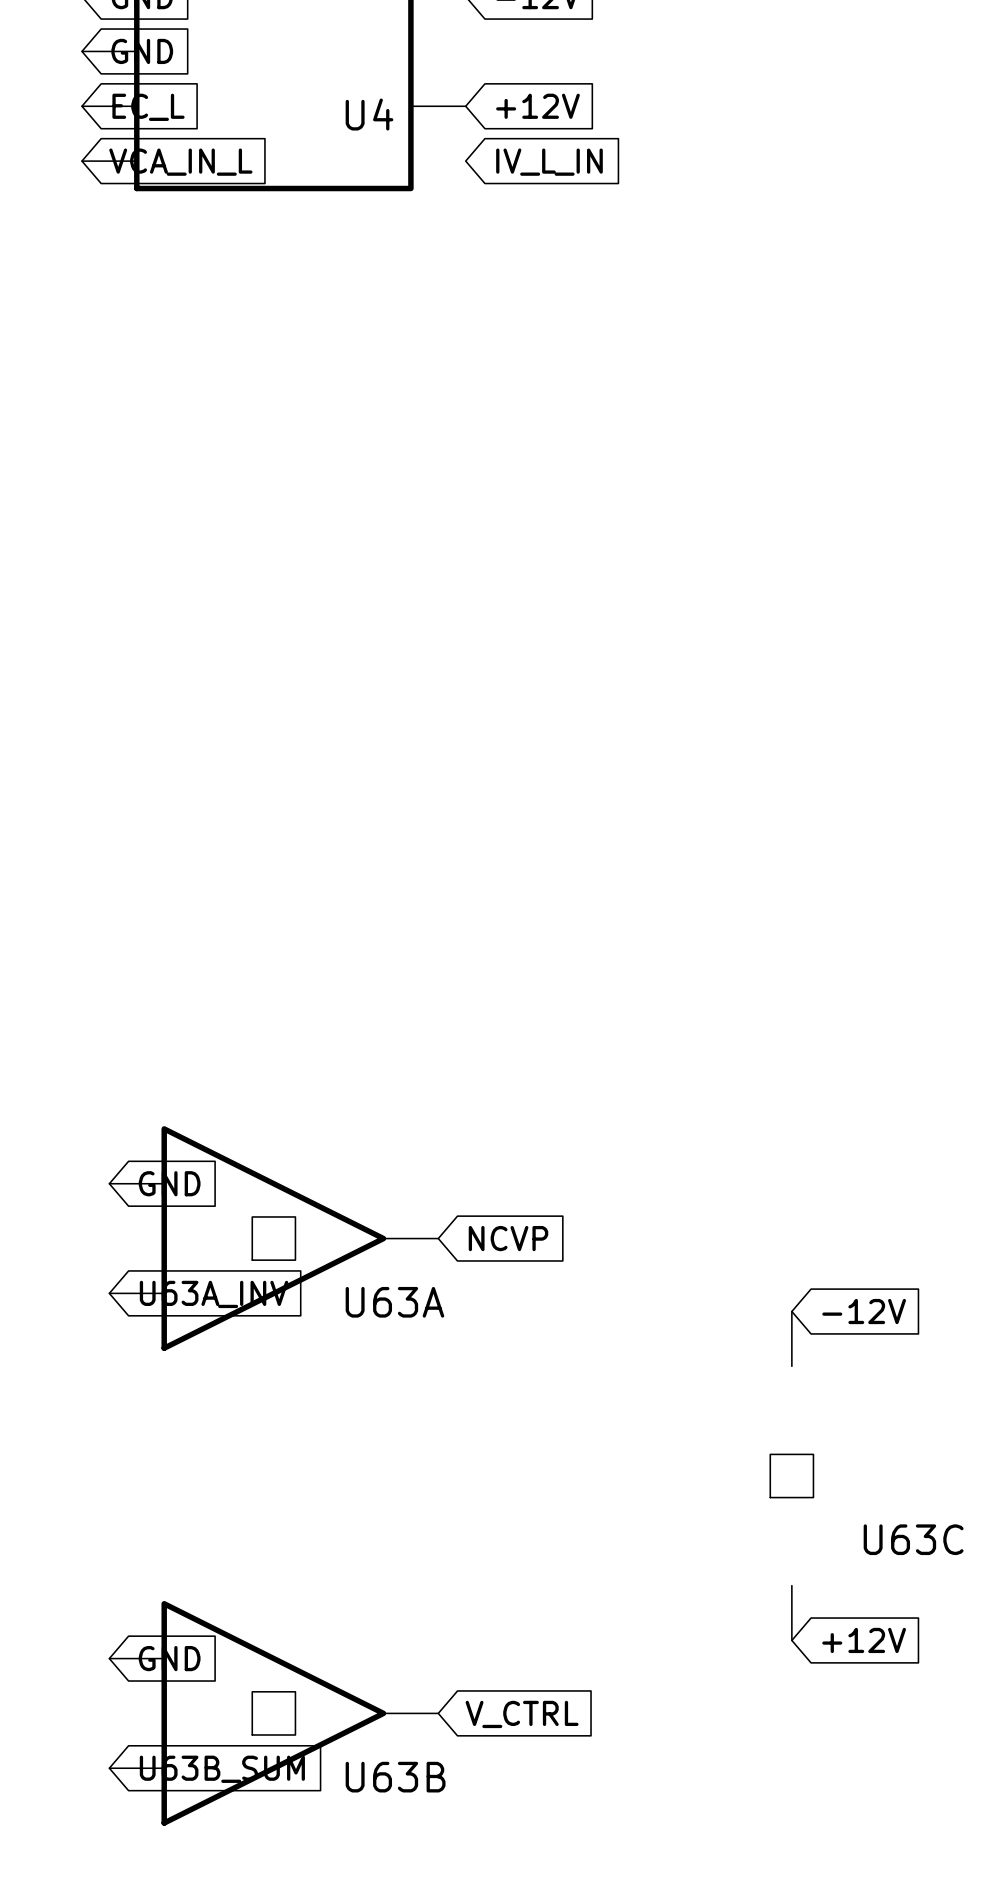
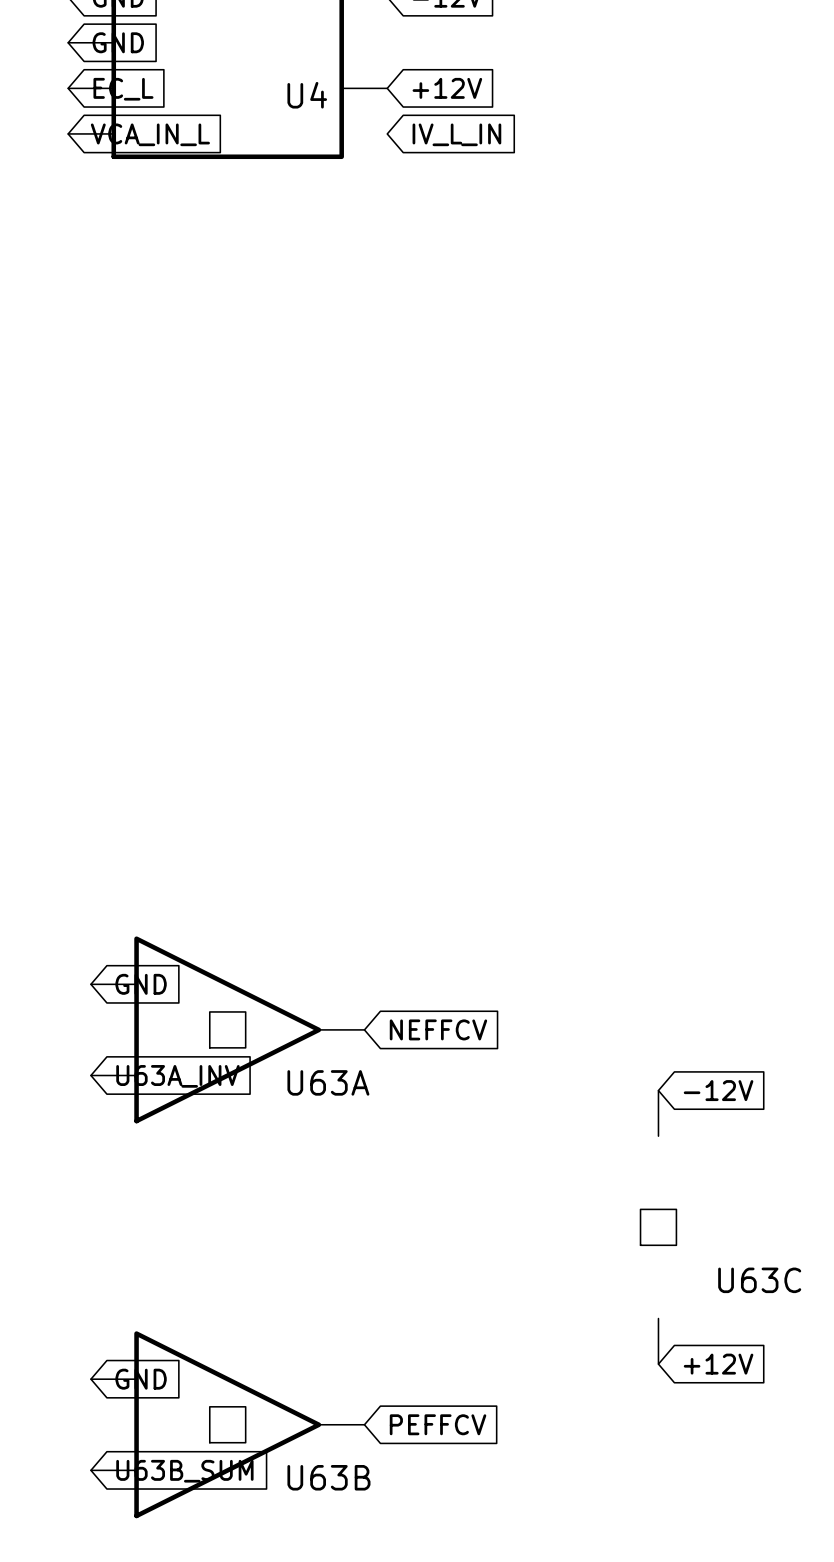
global label: NCVP (508, 1238) -> NEFFCV (438, 1029)
global label: V_CTRL (522, 1714) -> PEFFCV (438, 1424)

